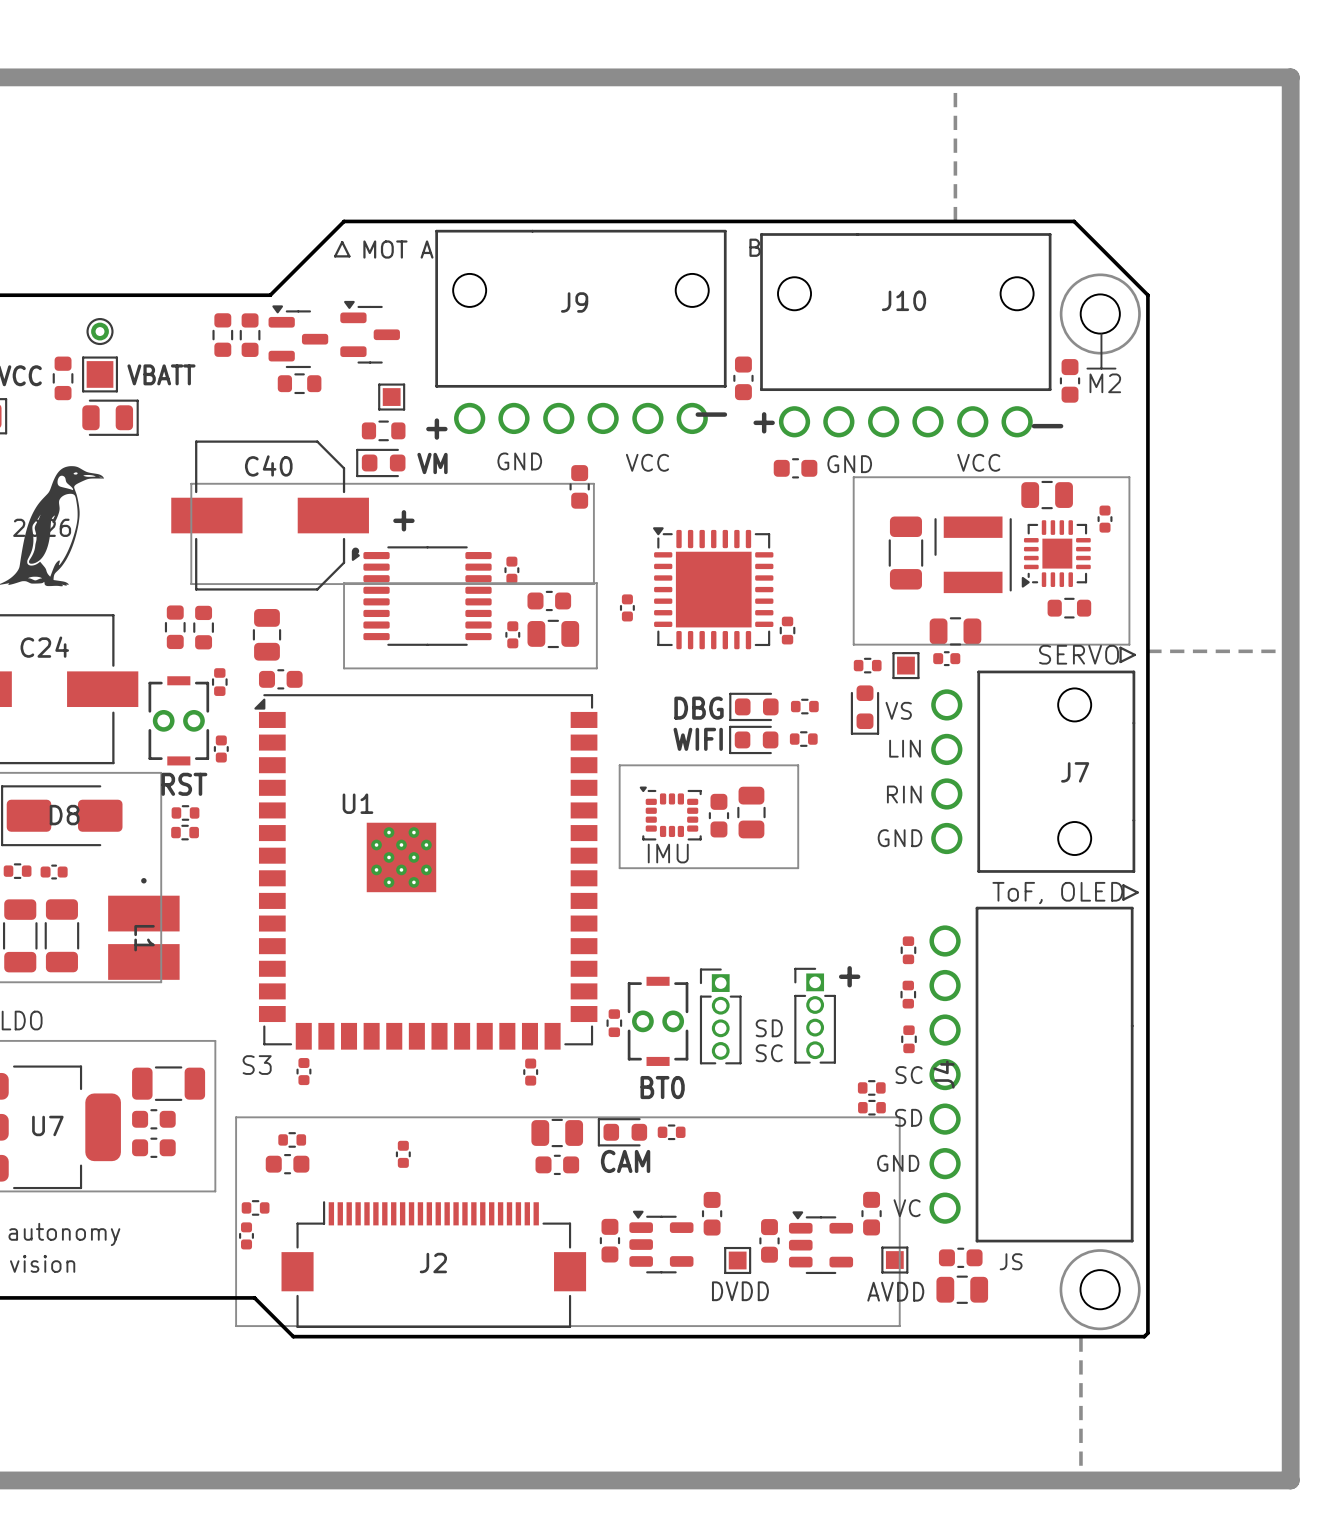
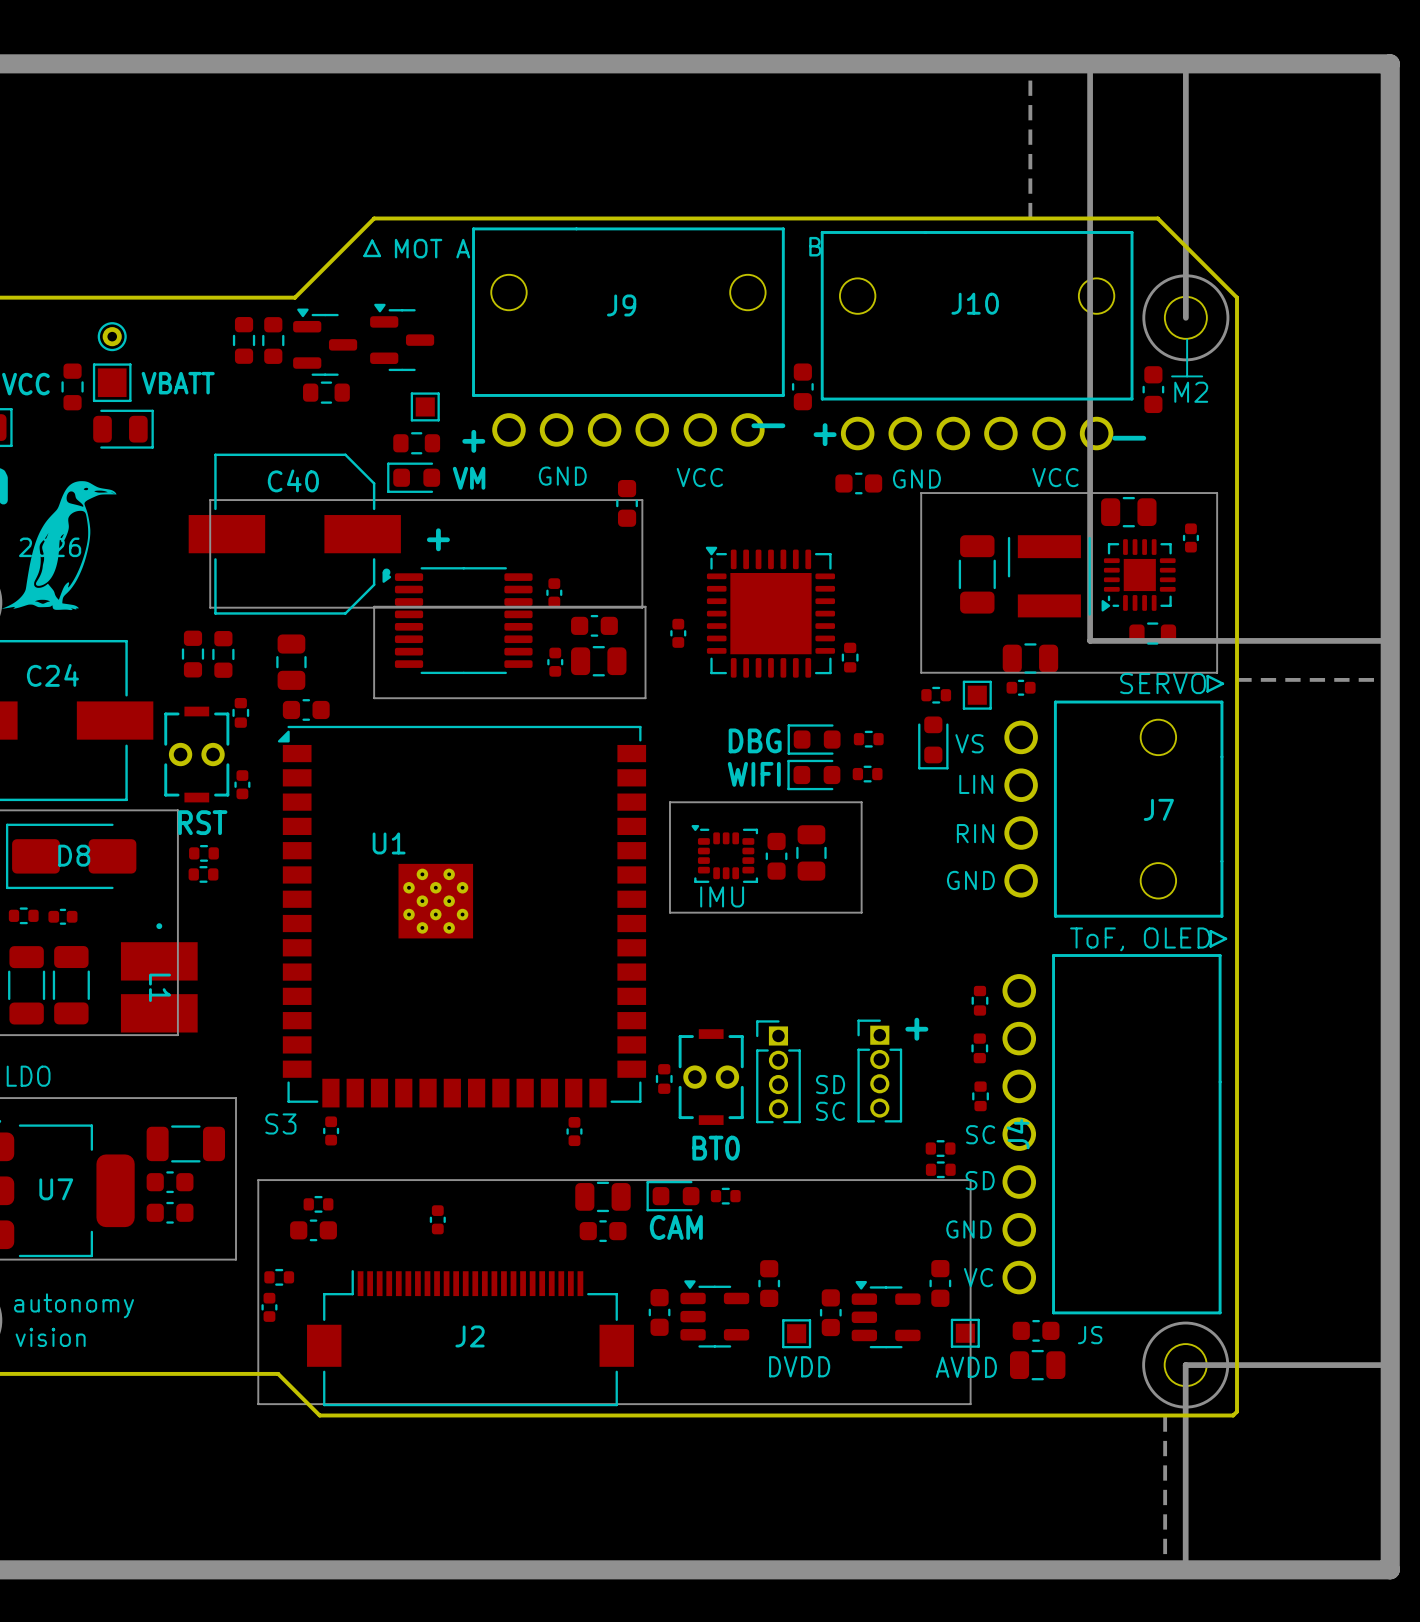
line: none -> (1090, 67) (1090, 640)
line: none -> (1185, 69) (1185, 317)
line: none -> (1090, 640) (1395, 640)
line: none -> (1395, 1365) (1185, 1365) (1185, 1575)

